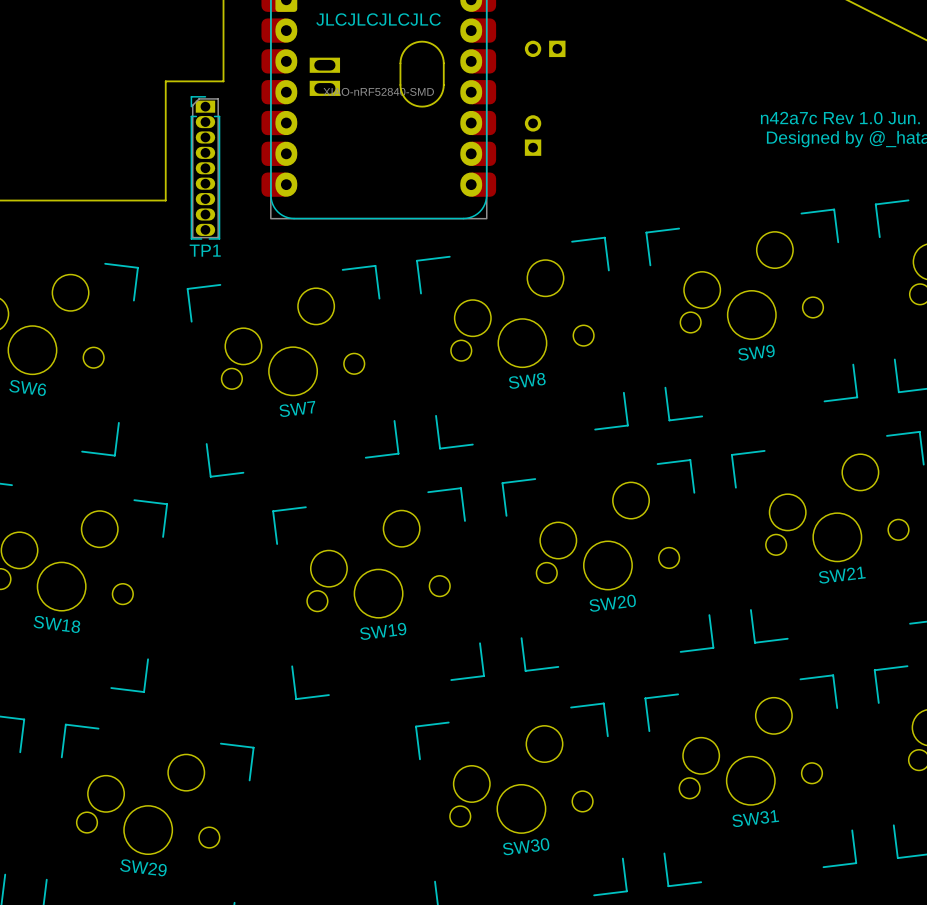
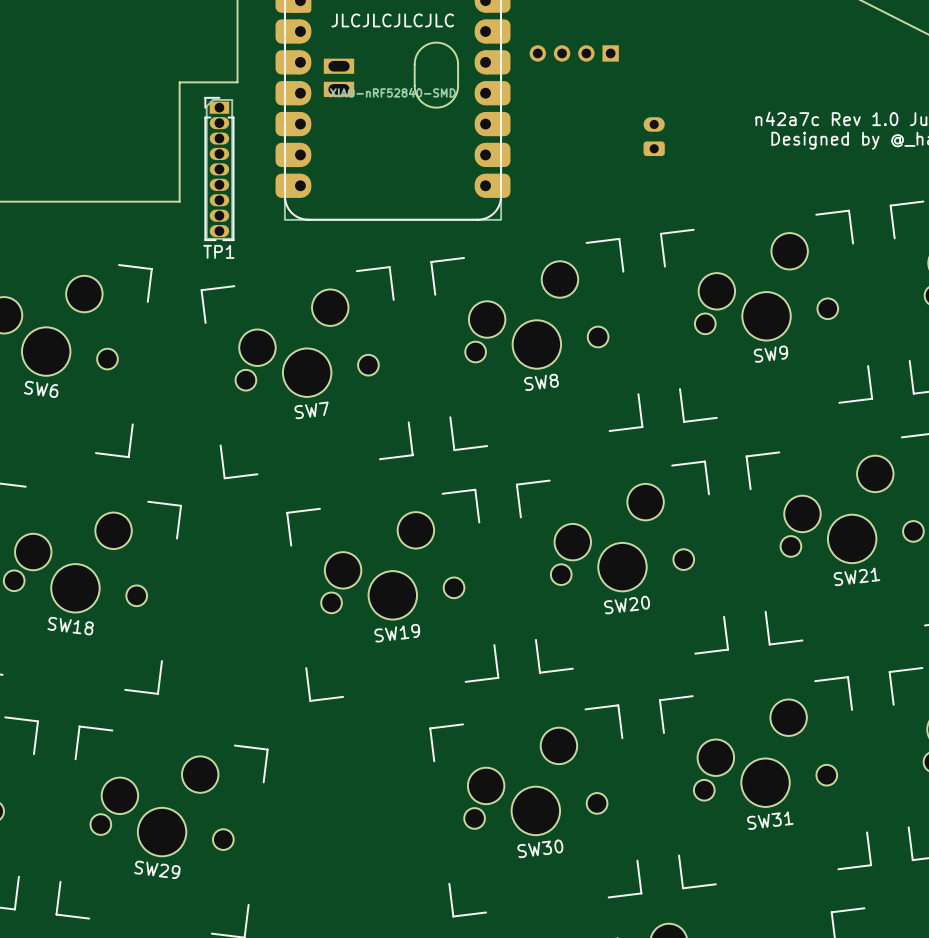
part: (545, 48) -> none
part: none -> (574, 53)
part: (533, 135) -> none
part: none -> (654, 136)

